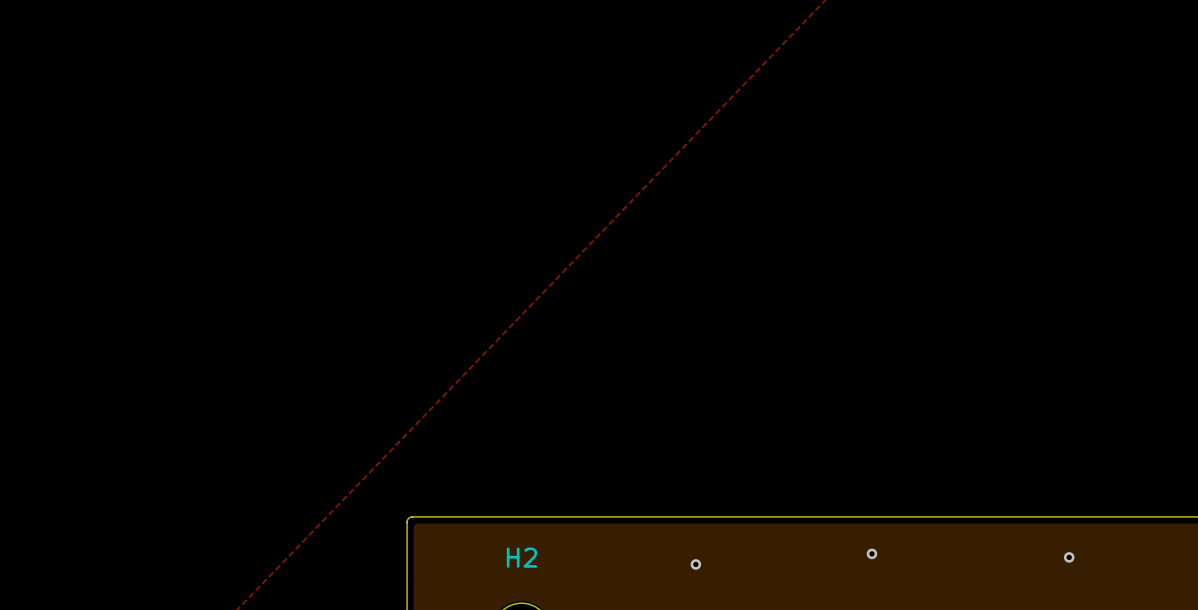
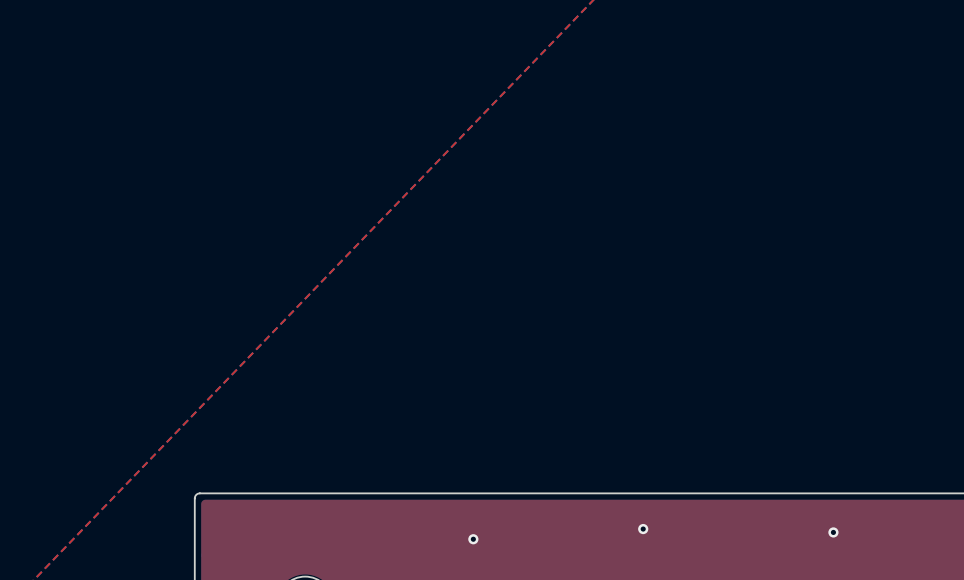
H2 name: H2 (521, 557) -> none

